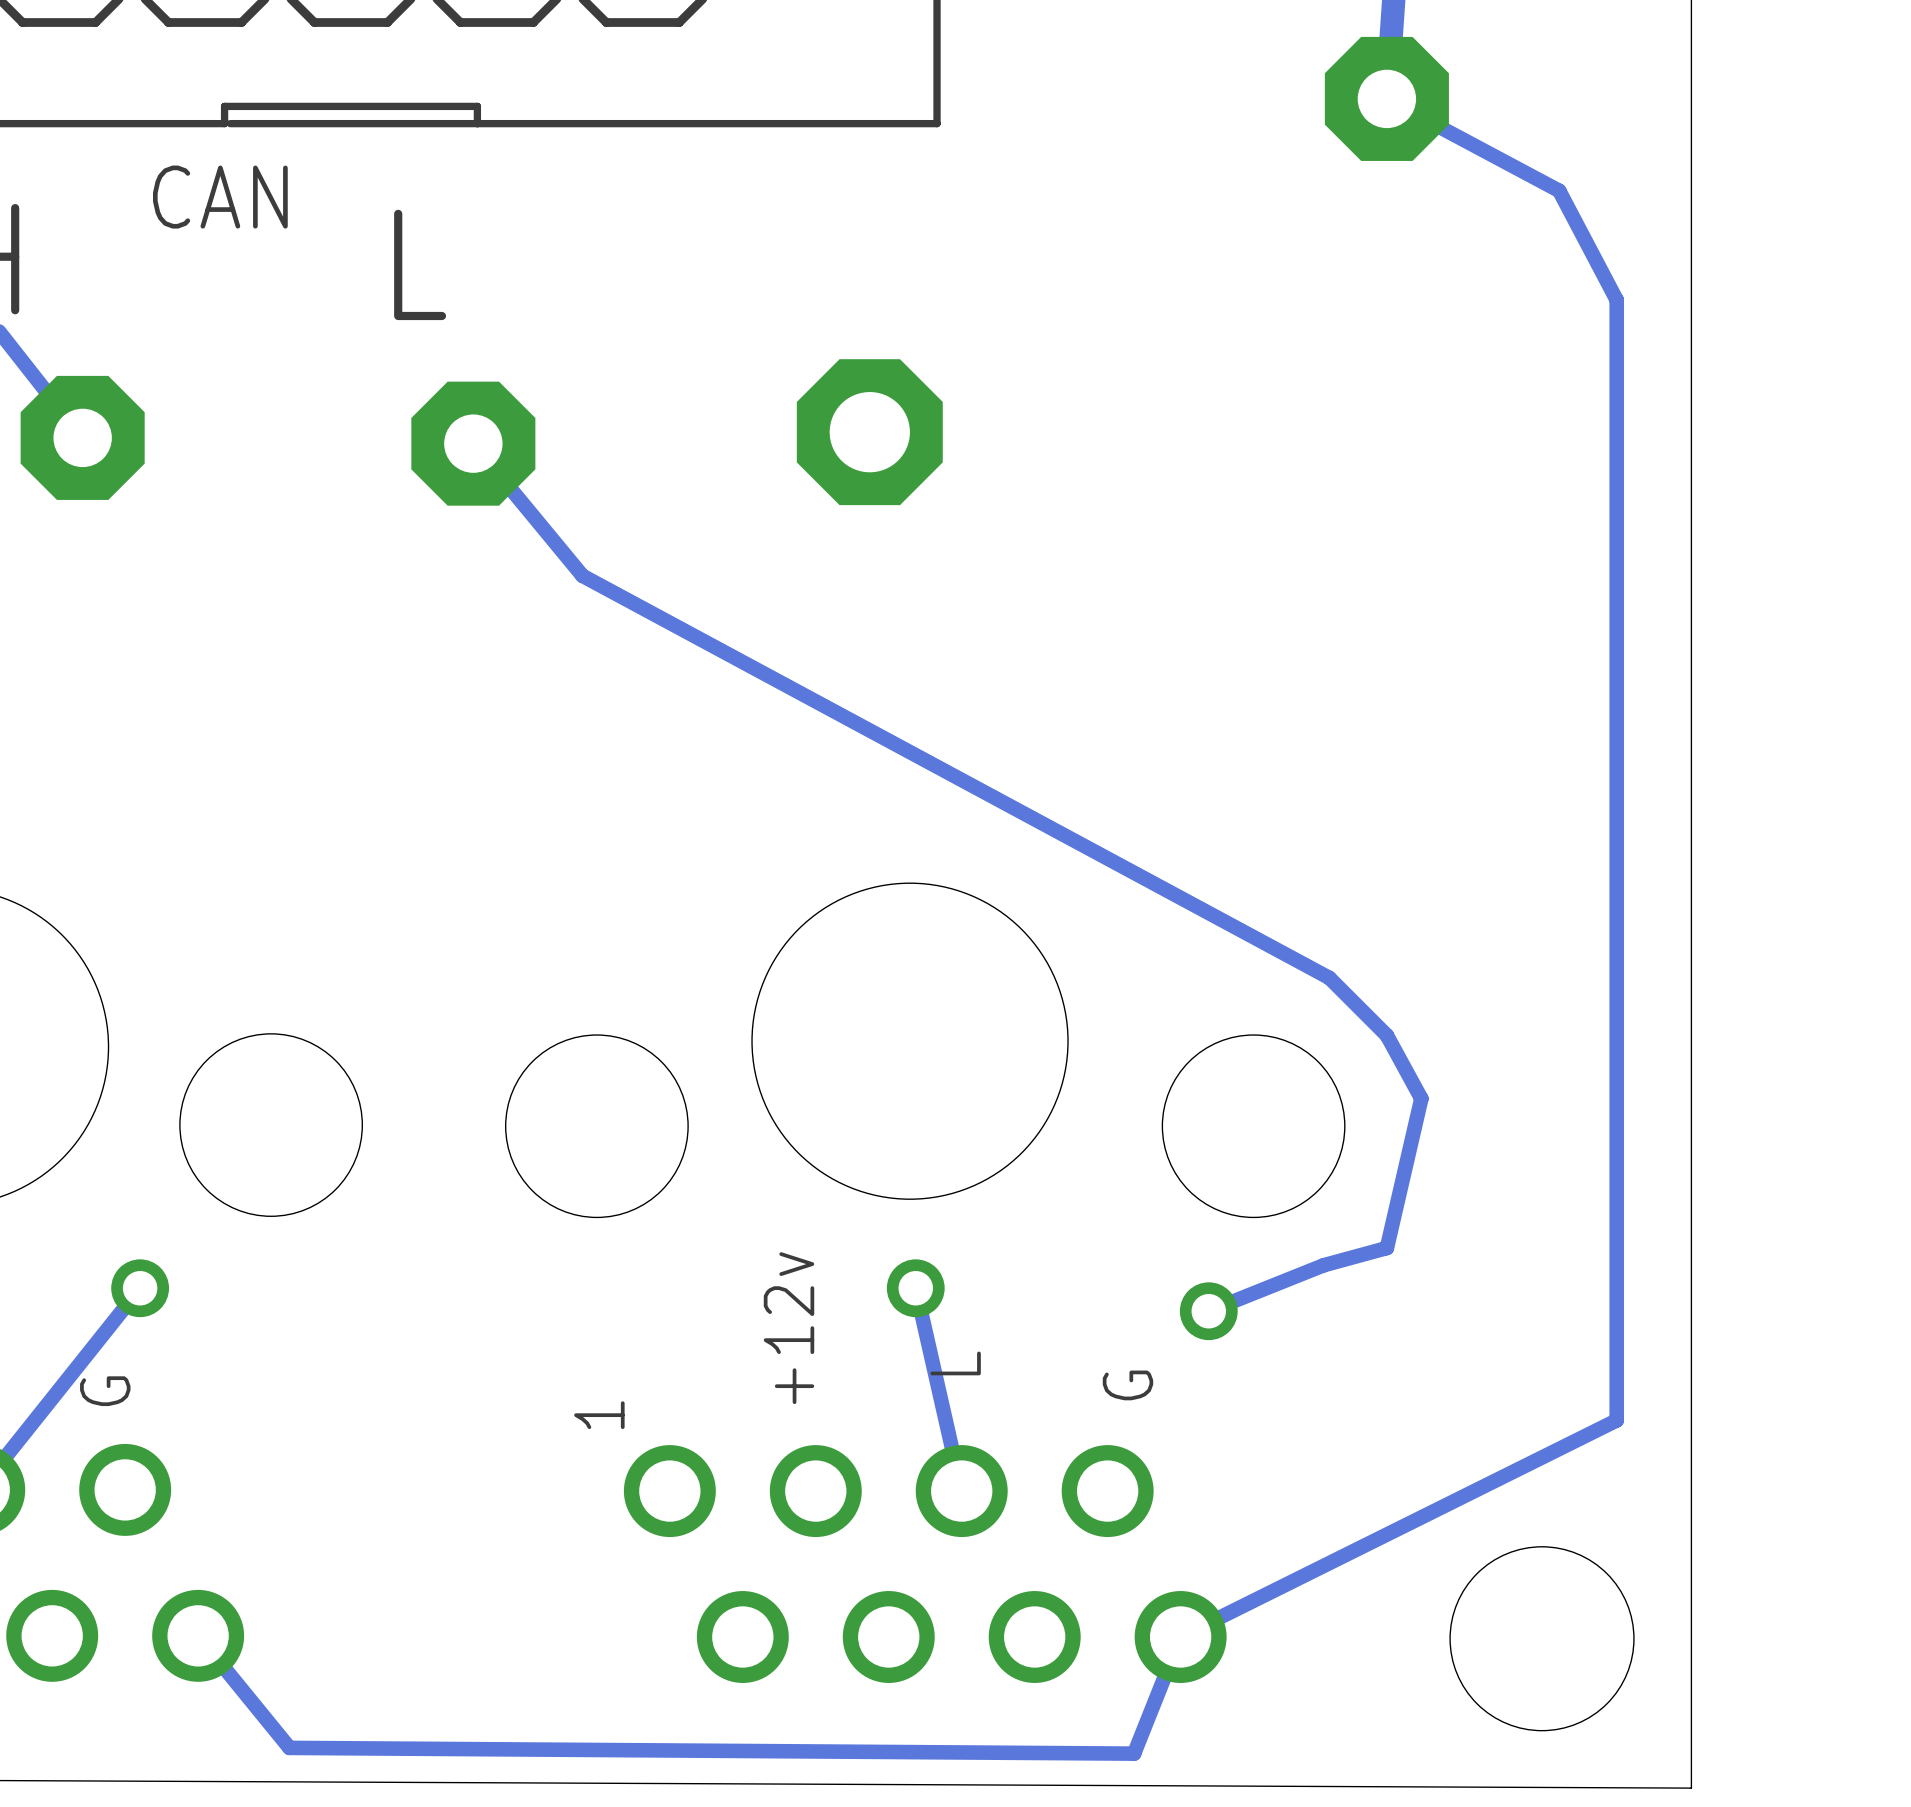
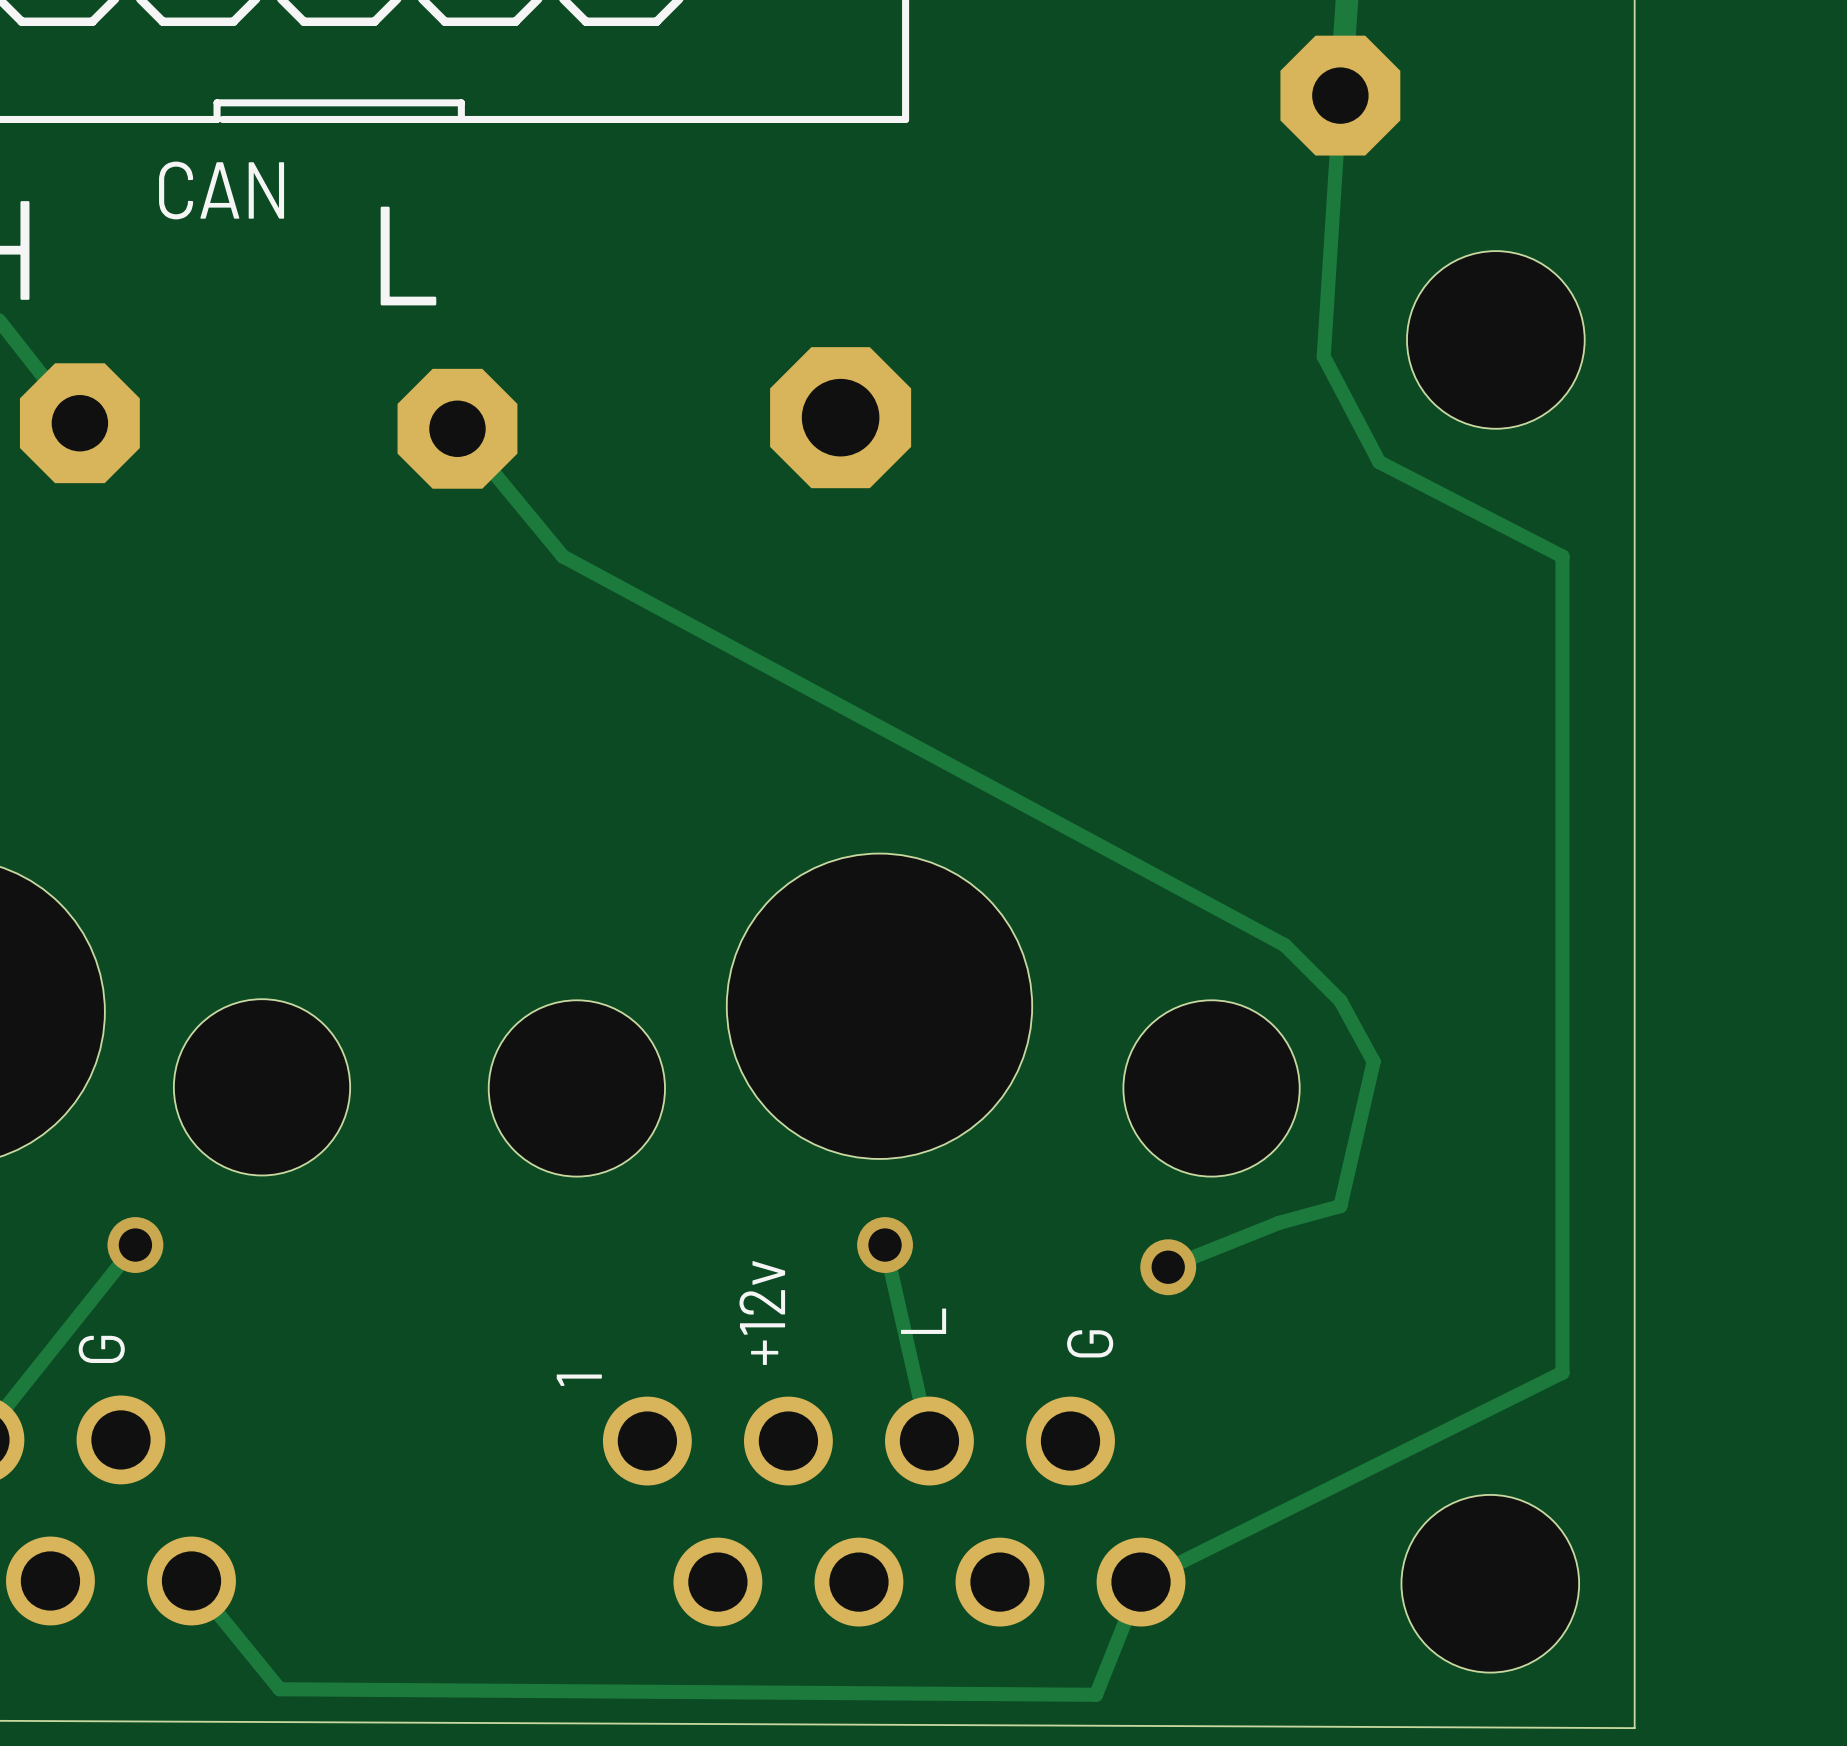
track: (1386, 98) (1559, 190) (1616, 300) (1616, 575) -> (1340, 95) (1323, 356) (1379, 462) (1562, 556)
hole: none -> (1495, 339)

